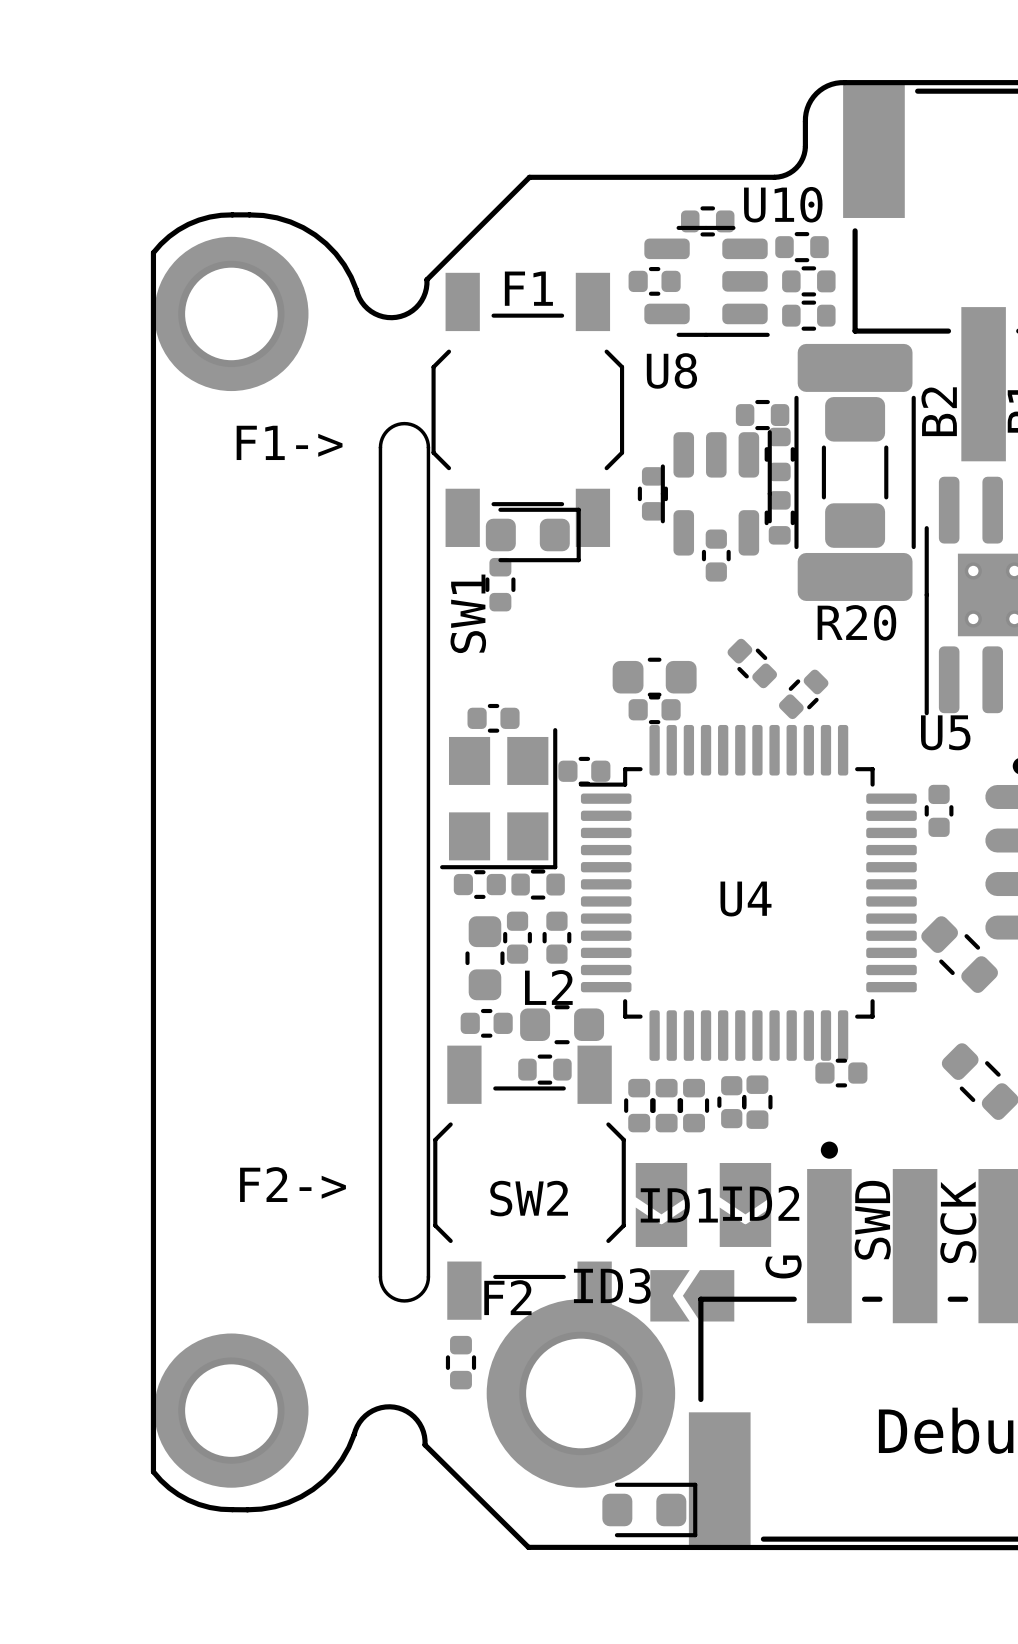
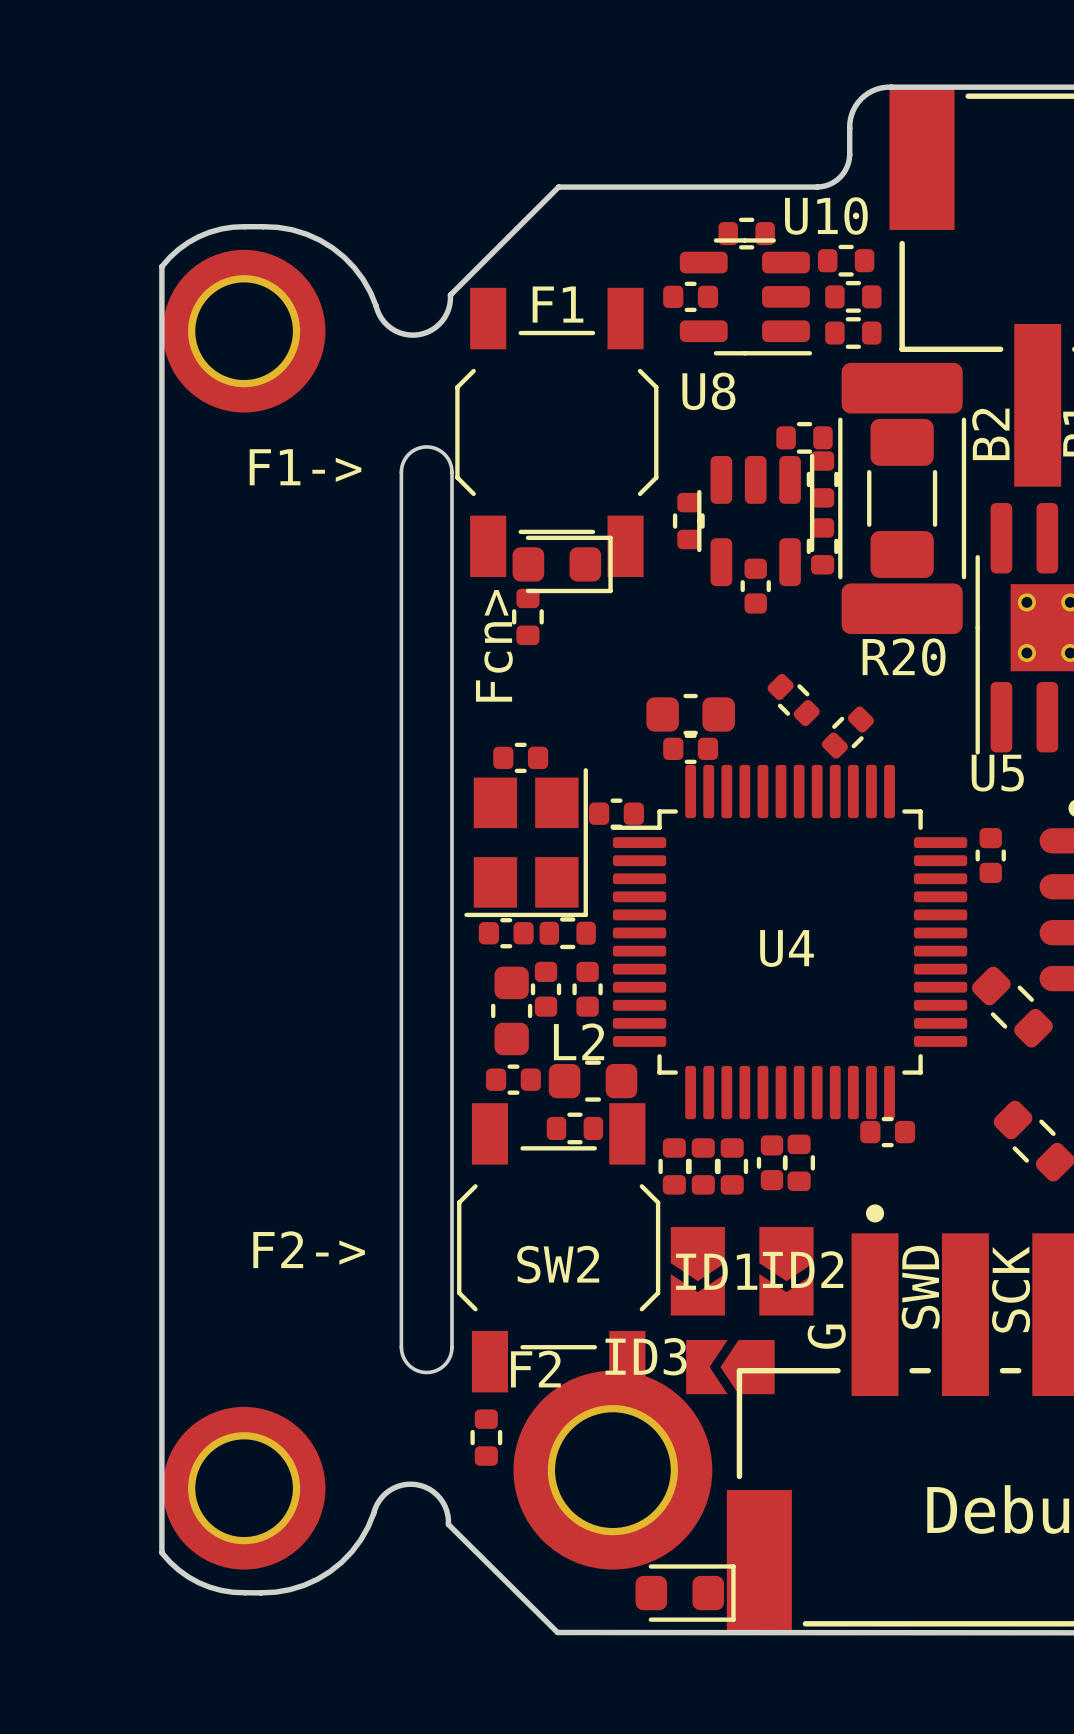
part value: SW1 (468, 613) -> Fcn> (494, 645)

